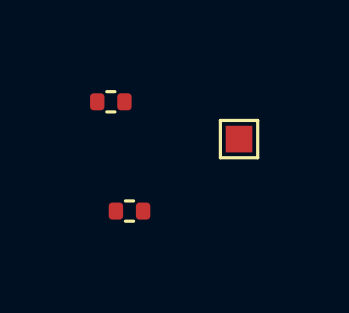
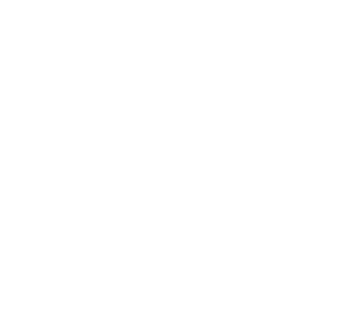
part: (110, 101) -> none
part: (239, 139) -> none
part: (129, 211) -> none

